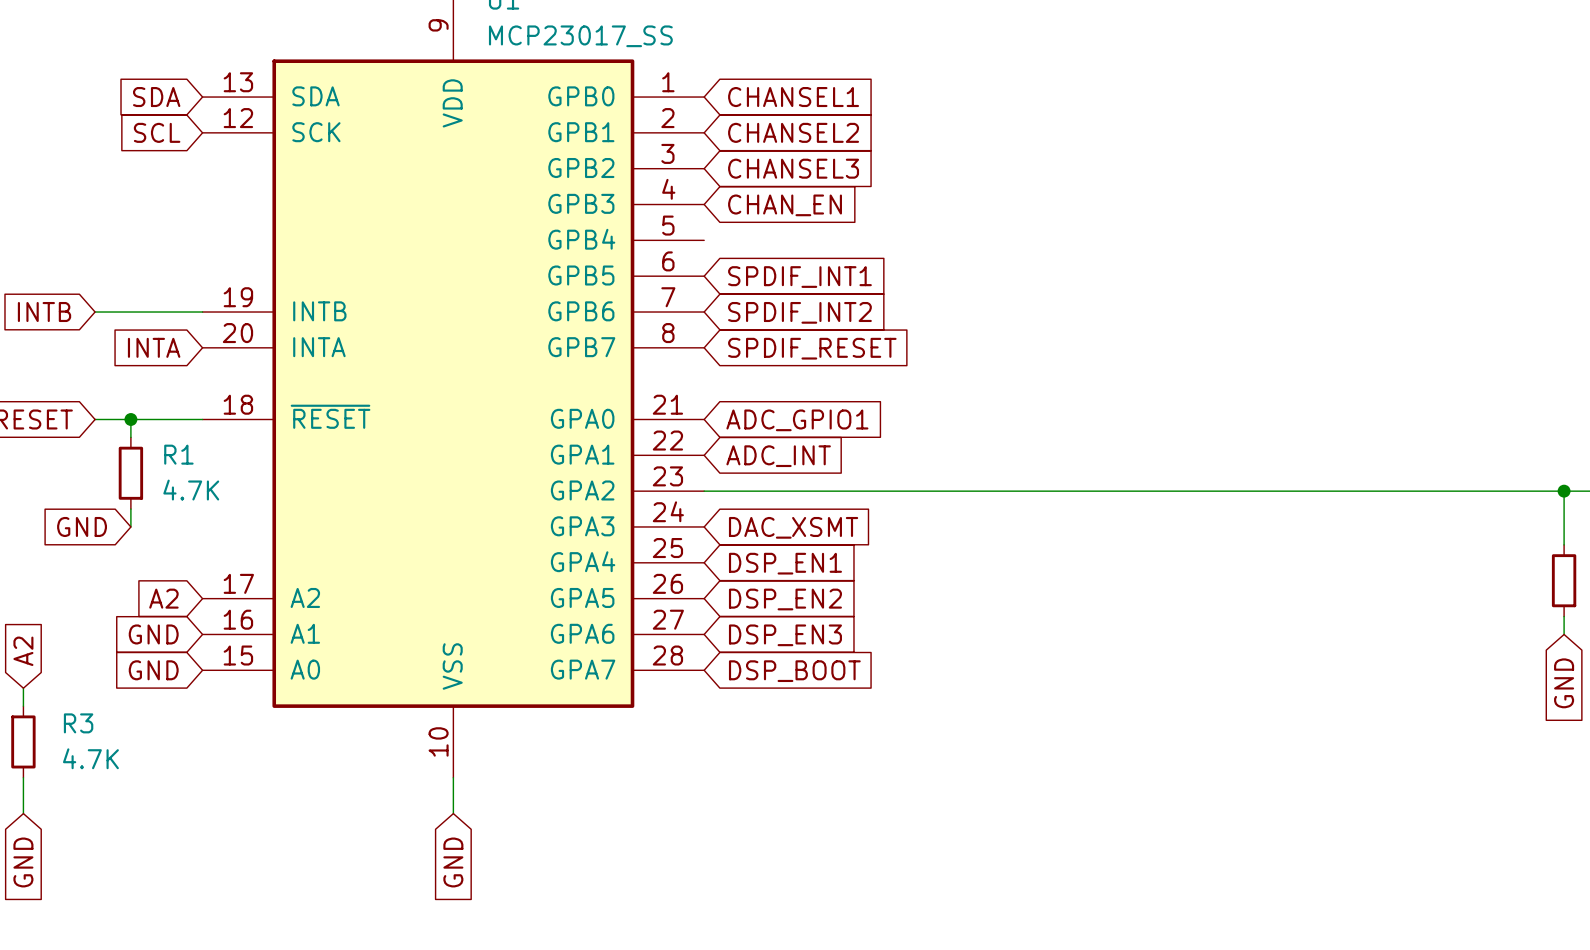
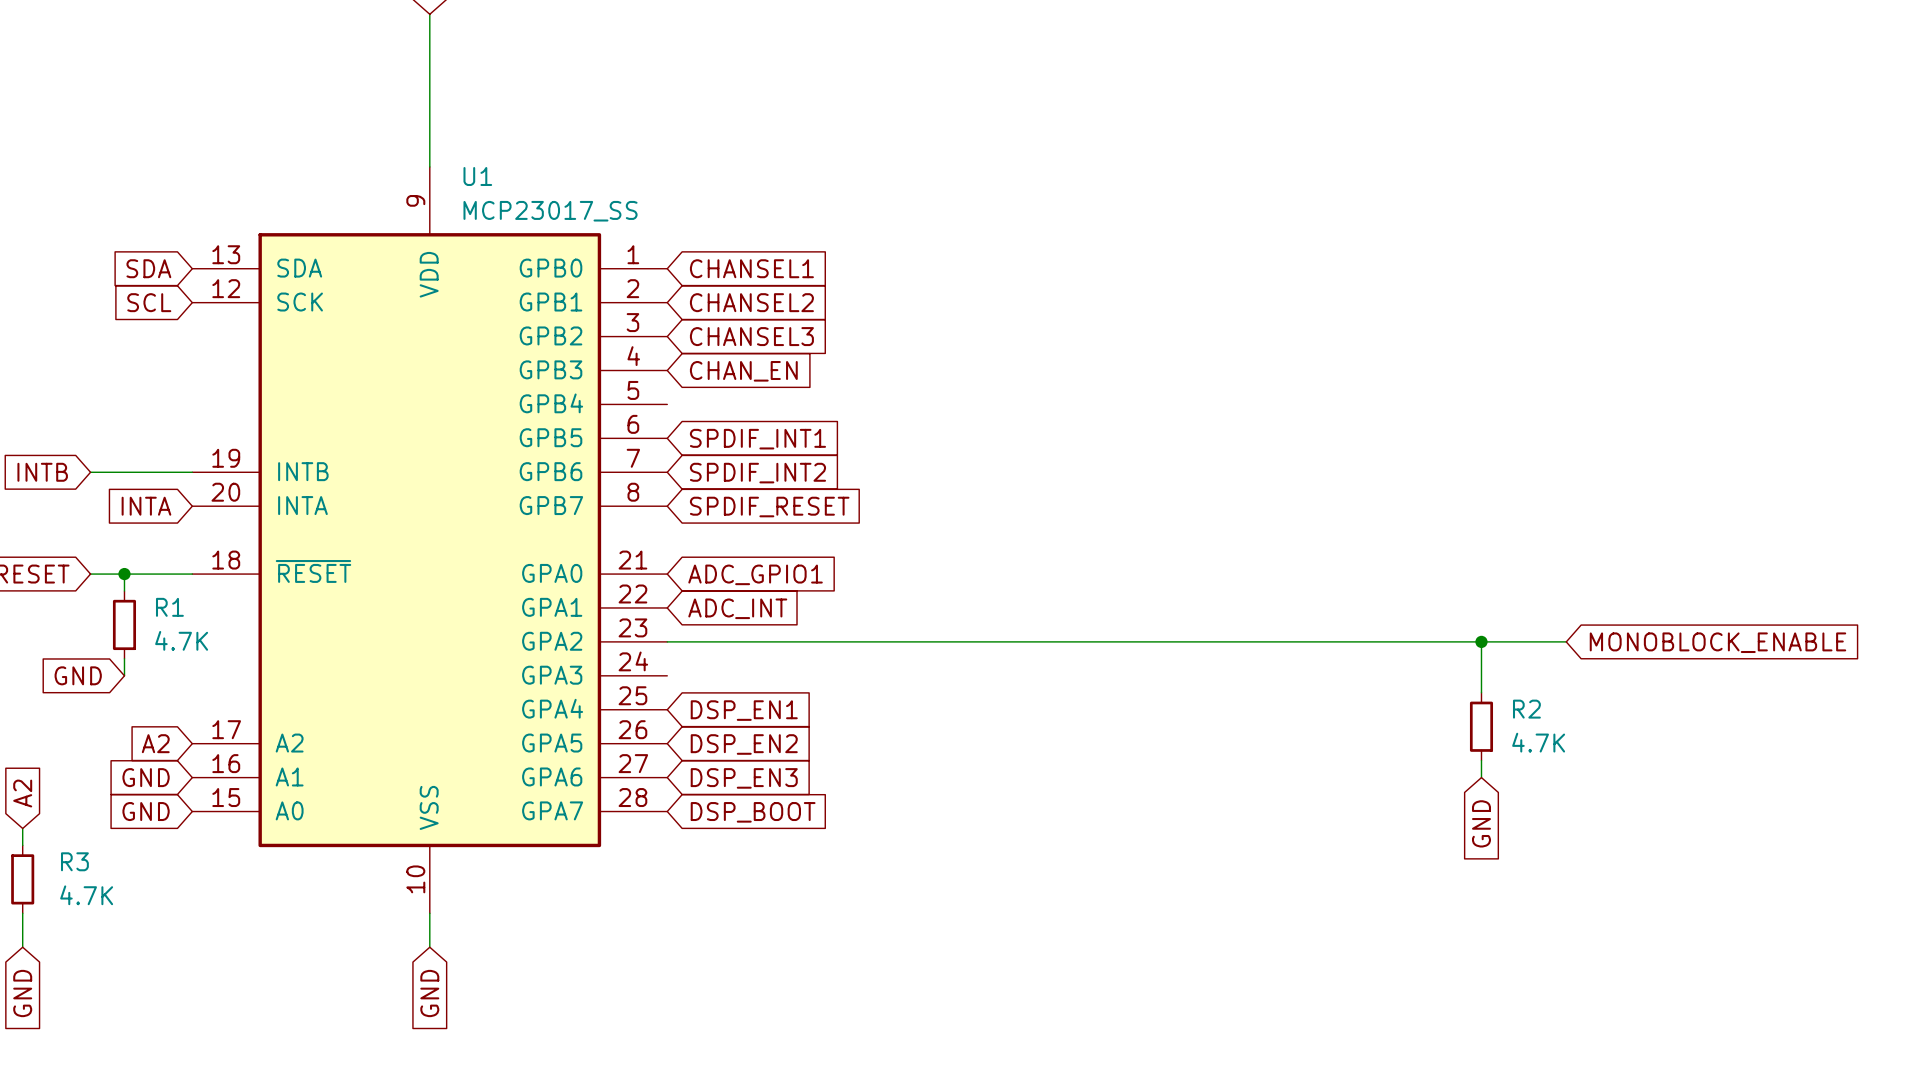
global label: DAC_XSMT (793, 527) -> none

